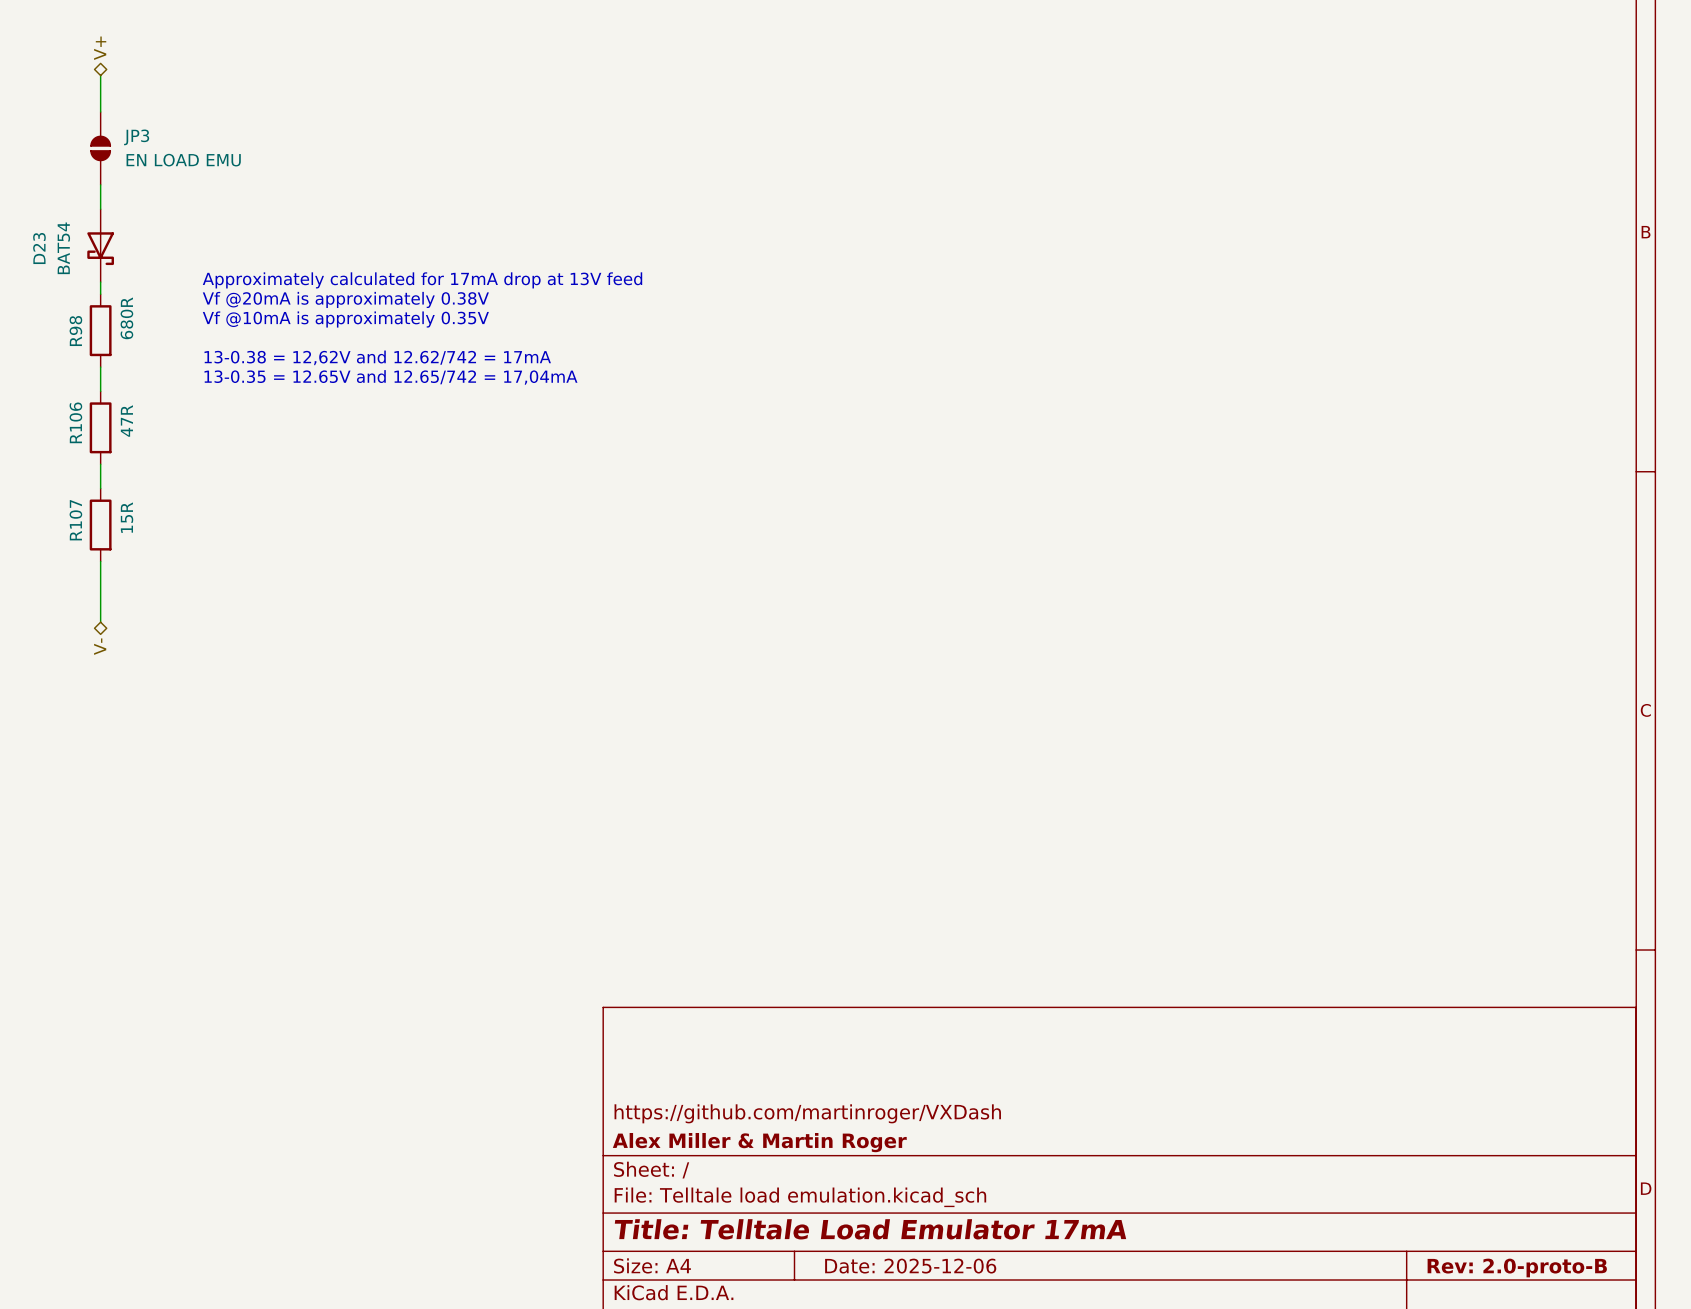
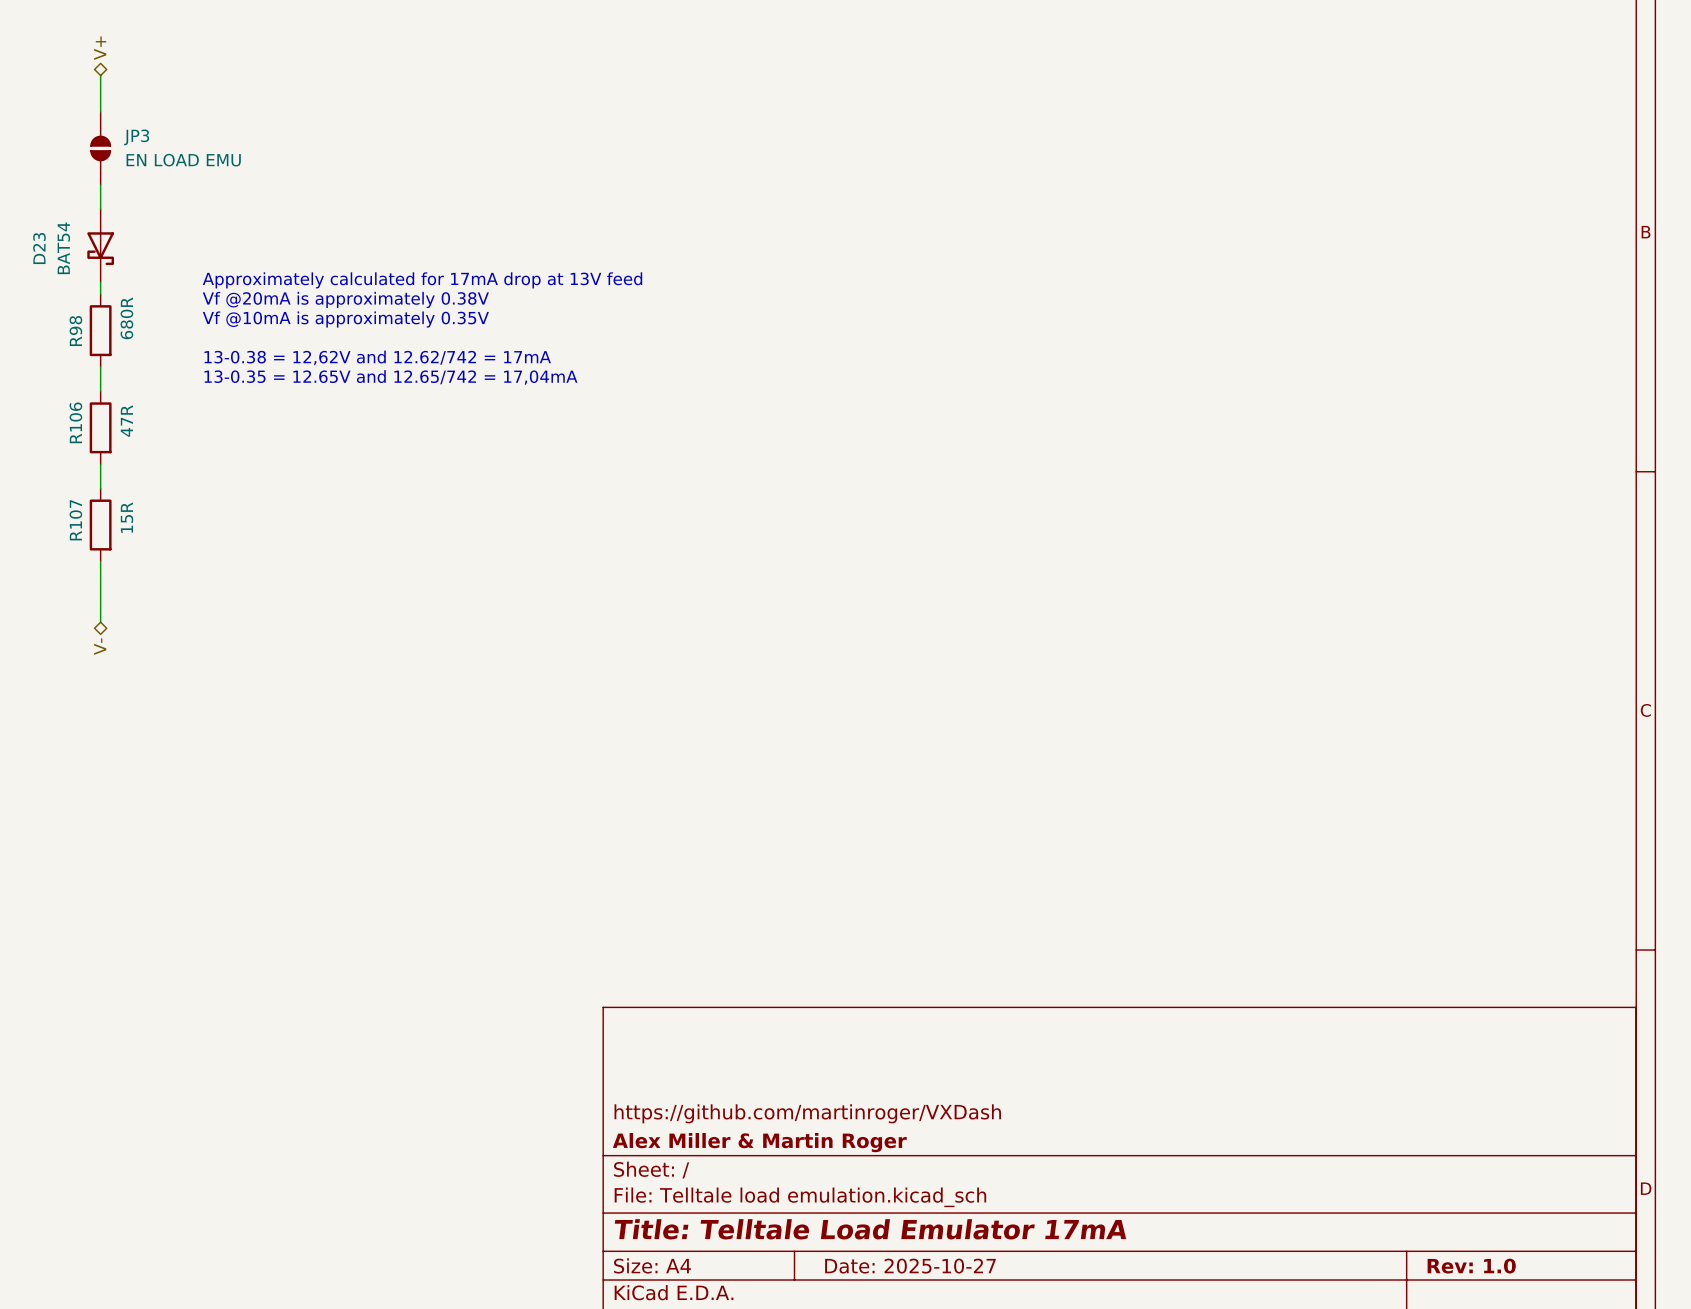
title block: Date: 2025-12-06 (910, 1266) -> Date: 2025-10-27 (910, 1266)
title block: Rev: 2.0-proto-B (1517, 1267) -> Rev: 1.0 (1471, 1266)

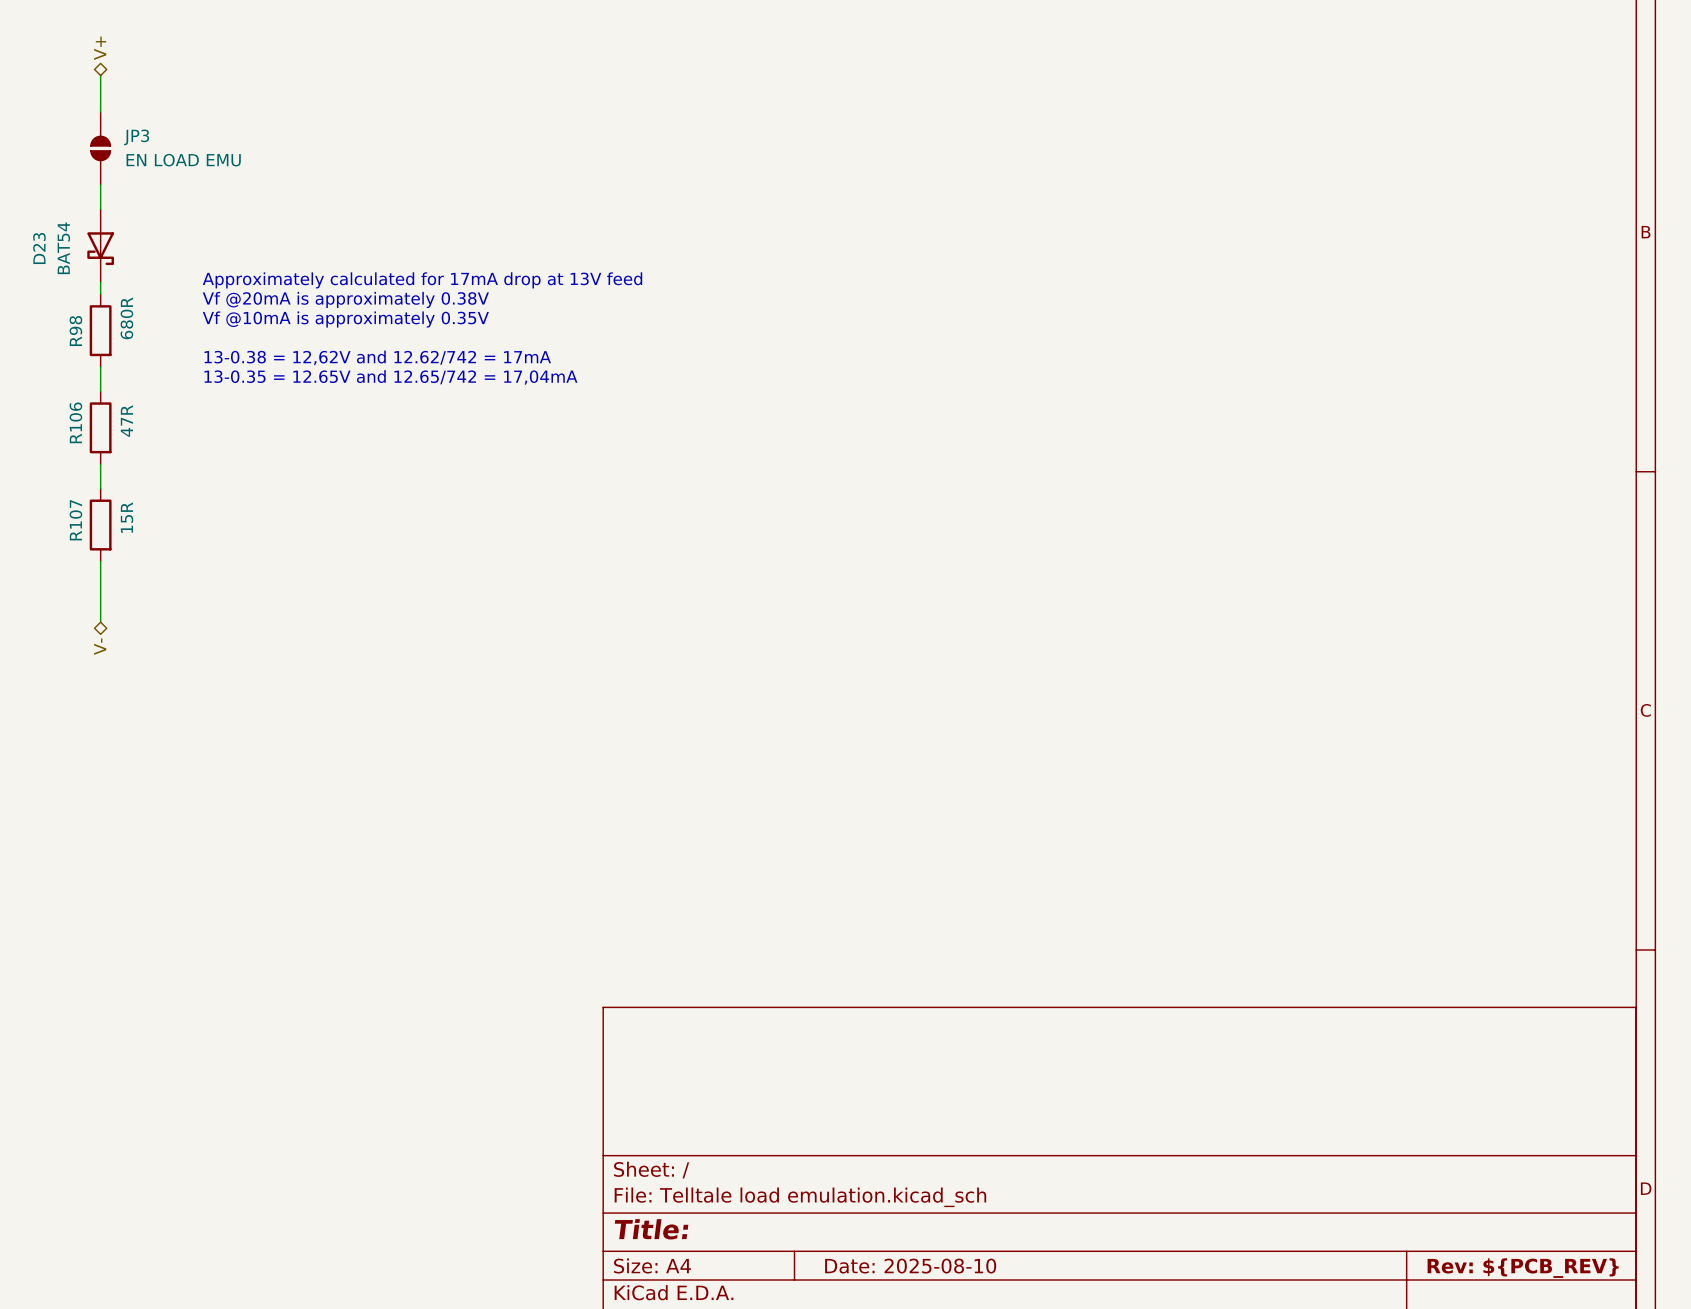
title block: https://github.com/martinroger/VXDash (807, 1113) -> none
title block: Alex Miller & Martin Roger (759, 1142) -> none
title block: Title: Telltale Load Emulator 17mA (870, 1229) -> Title: (651, 1229)
title block: Date: 2025-10-27 (910, 1266) -> Date: 2025-08-10 (910, 1266)
title block: Rev: 1.0 (1471, 1266) -> Rev: ${PCB_REV} (1523, 1268)

